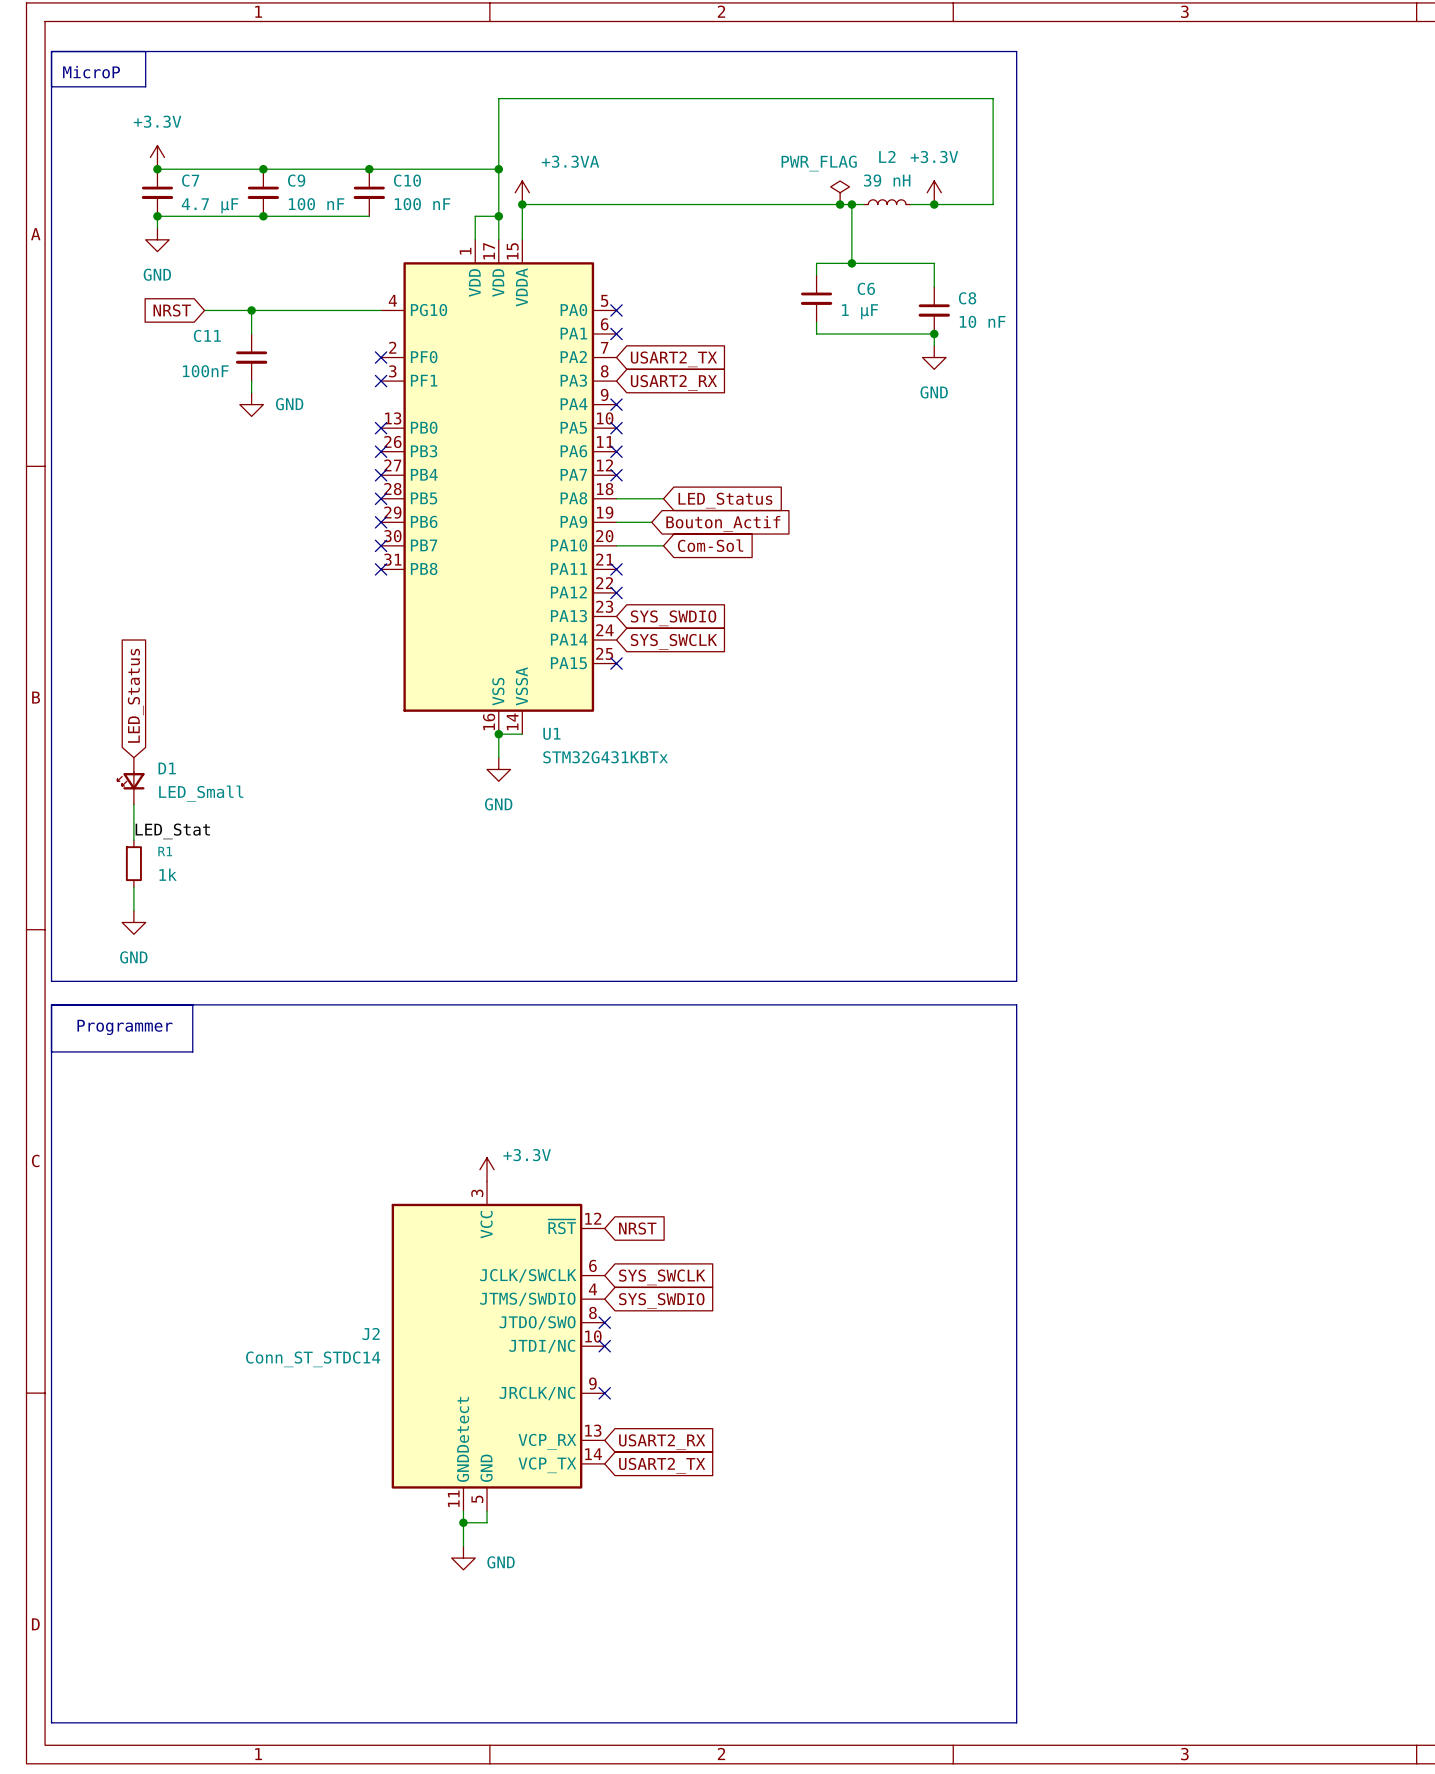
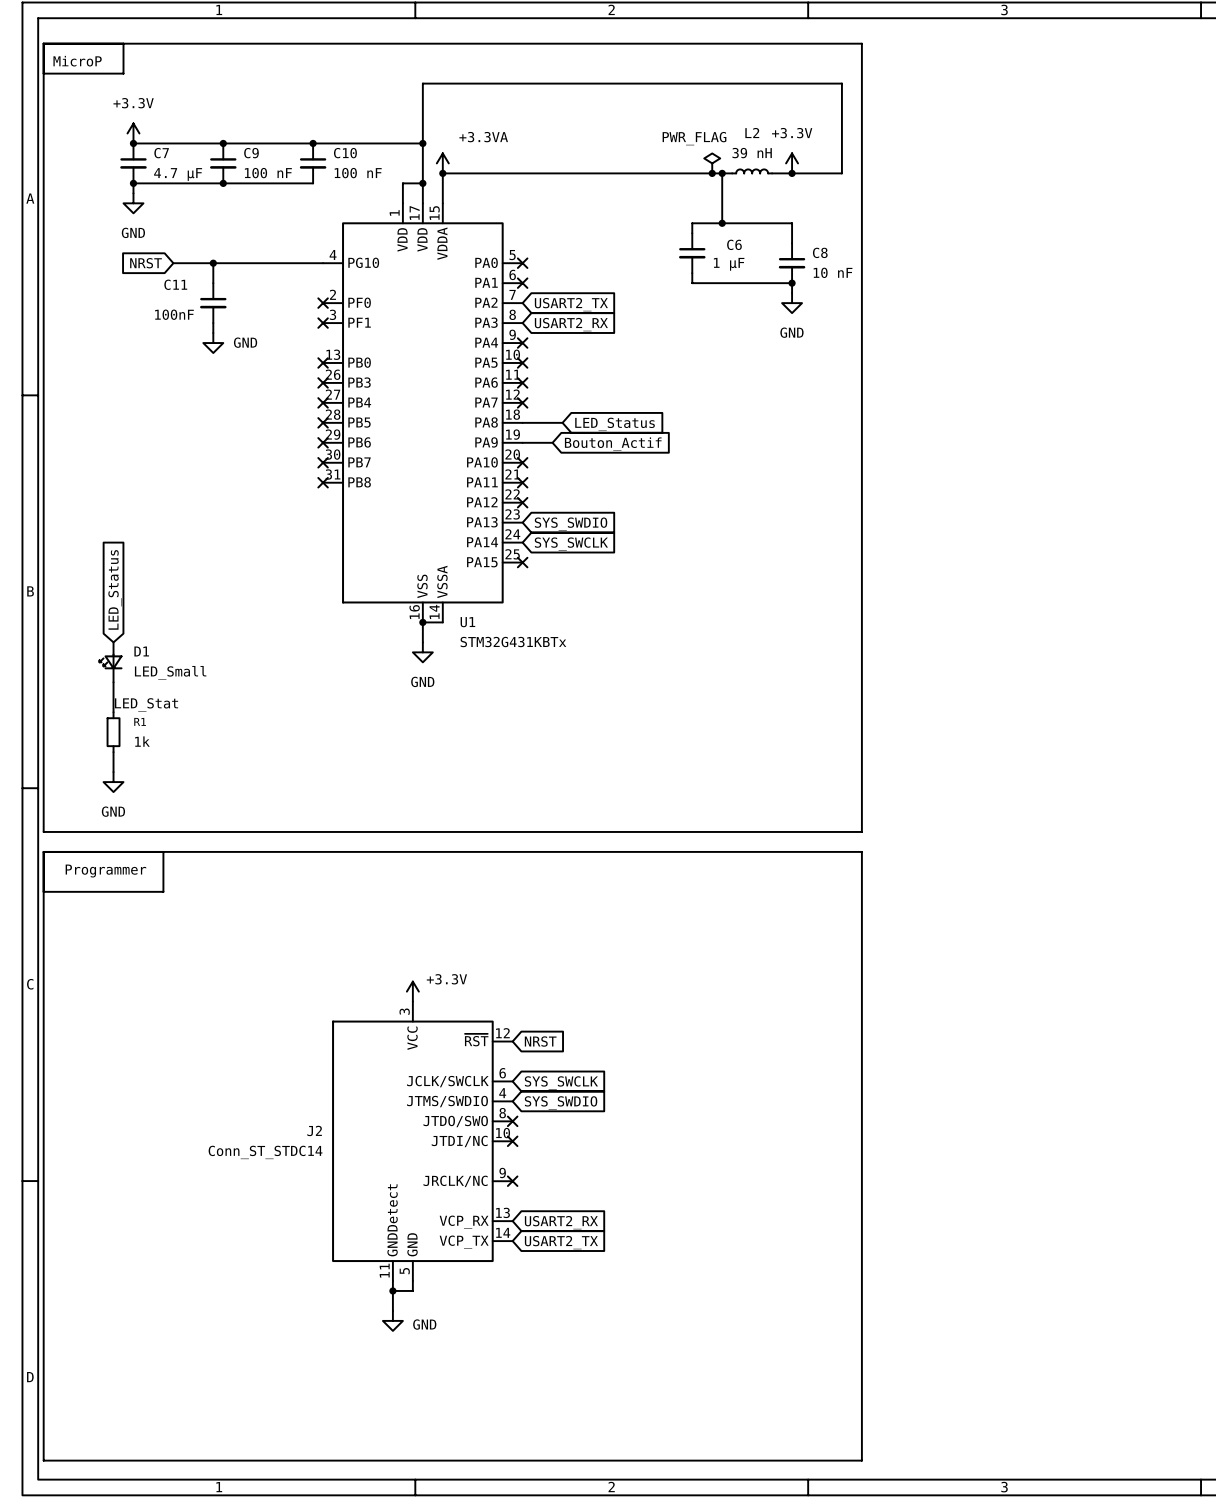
wire: (616, 545) (663, 545) -> none
no-connect mark: none -> (522, 462)
global label: Com-Sol (710, 545) -> none

